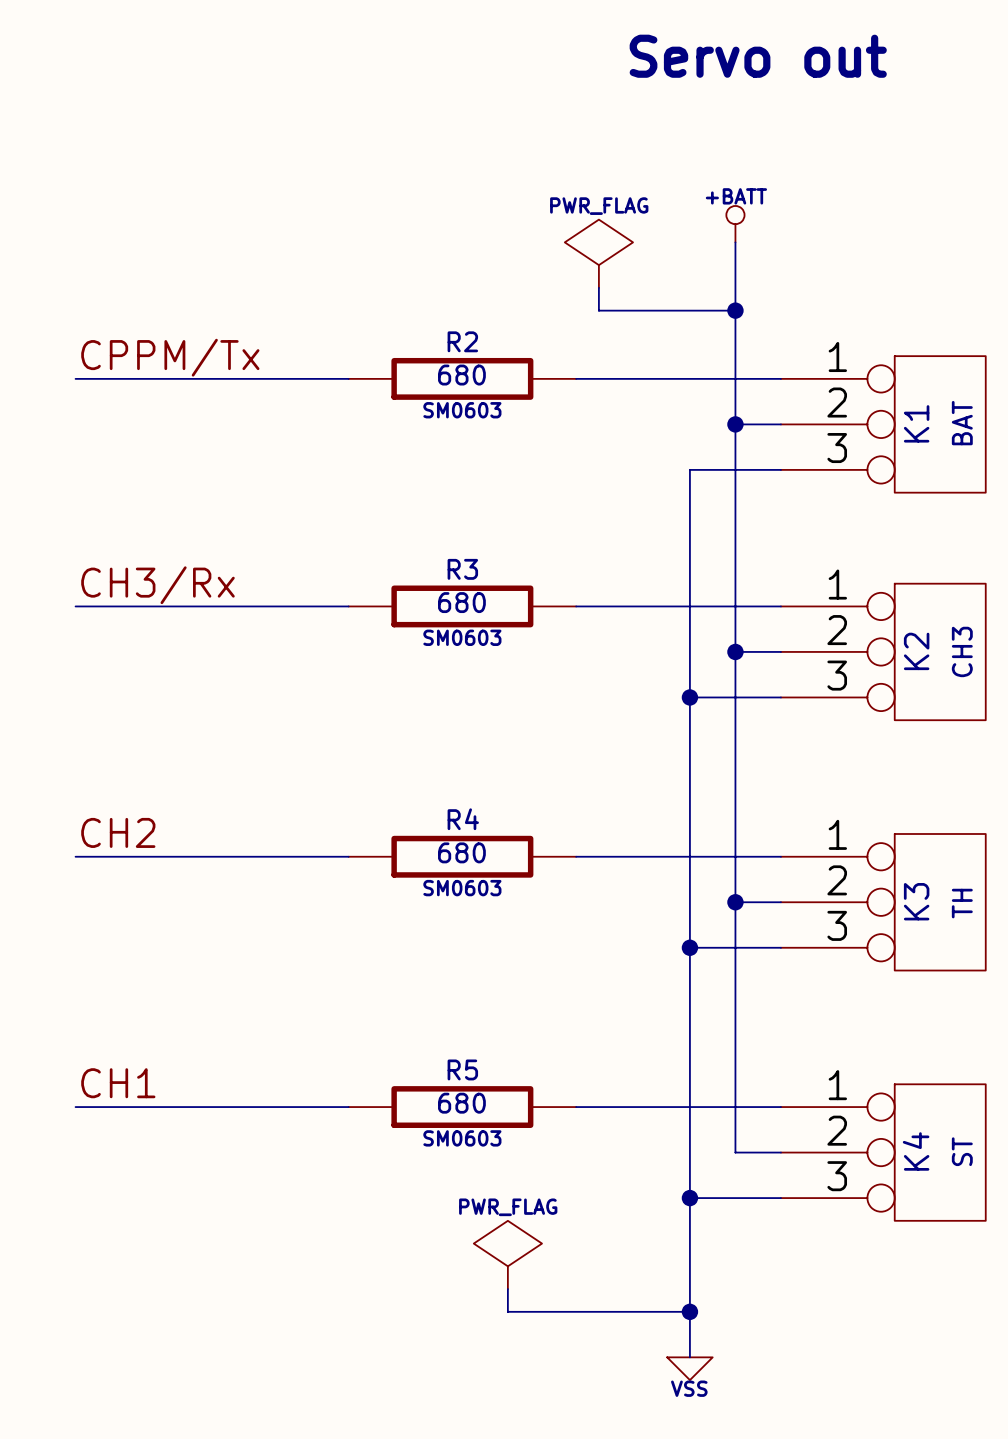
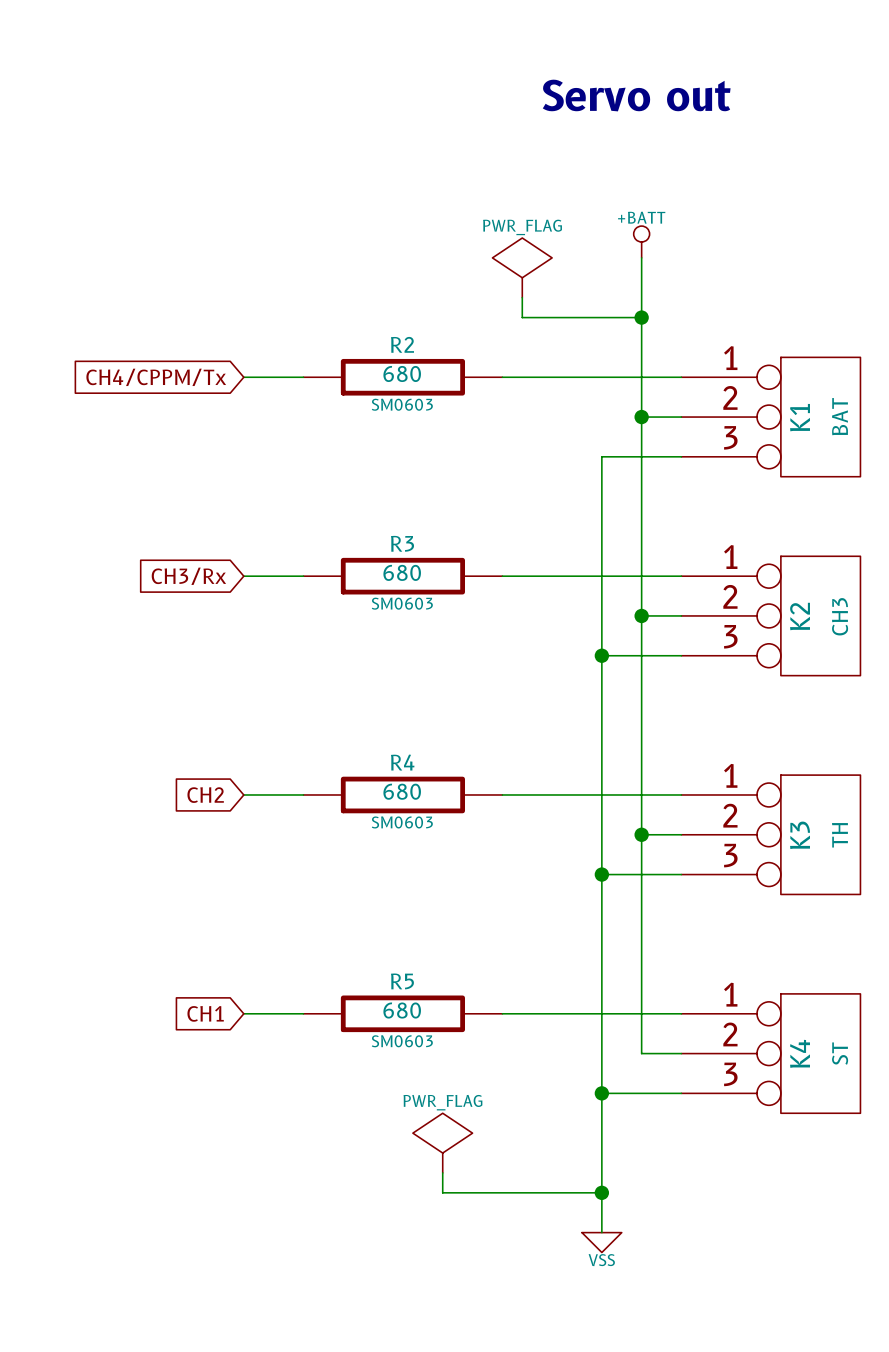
label: CPPM/Tx (170, 357) -> none
wire: (75, 378) (280, 378) -> none
global label: none -> CH4/CPPM/Tx (156, 377)
label: CH3/Rx (157, 585) -> none
wire: (75, 606) (280, 606) -> none
global label: none -> CH3/Rx (188, 576)
label: CH2 (118, 832) -> none
wire: (75, 856) (280, 856) -> none
global label: none -> CH2 (205, 795)
label: CH1 (118, 1083) -> none
wire: (75, 1107) (280, 1107) -> none
global label: none -> CH1 (205, 1013)

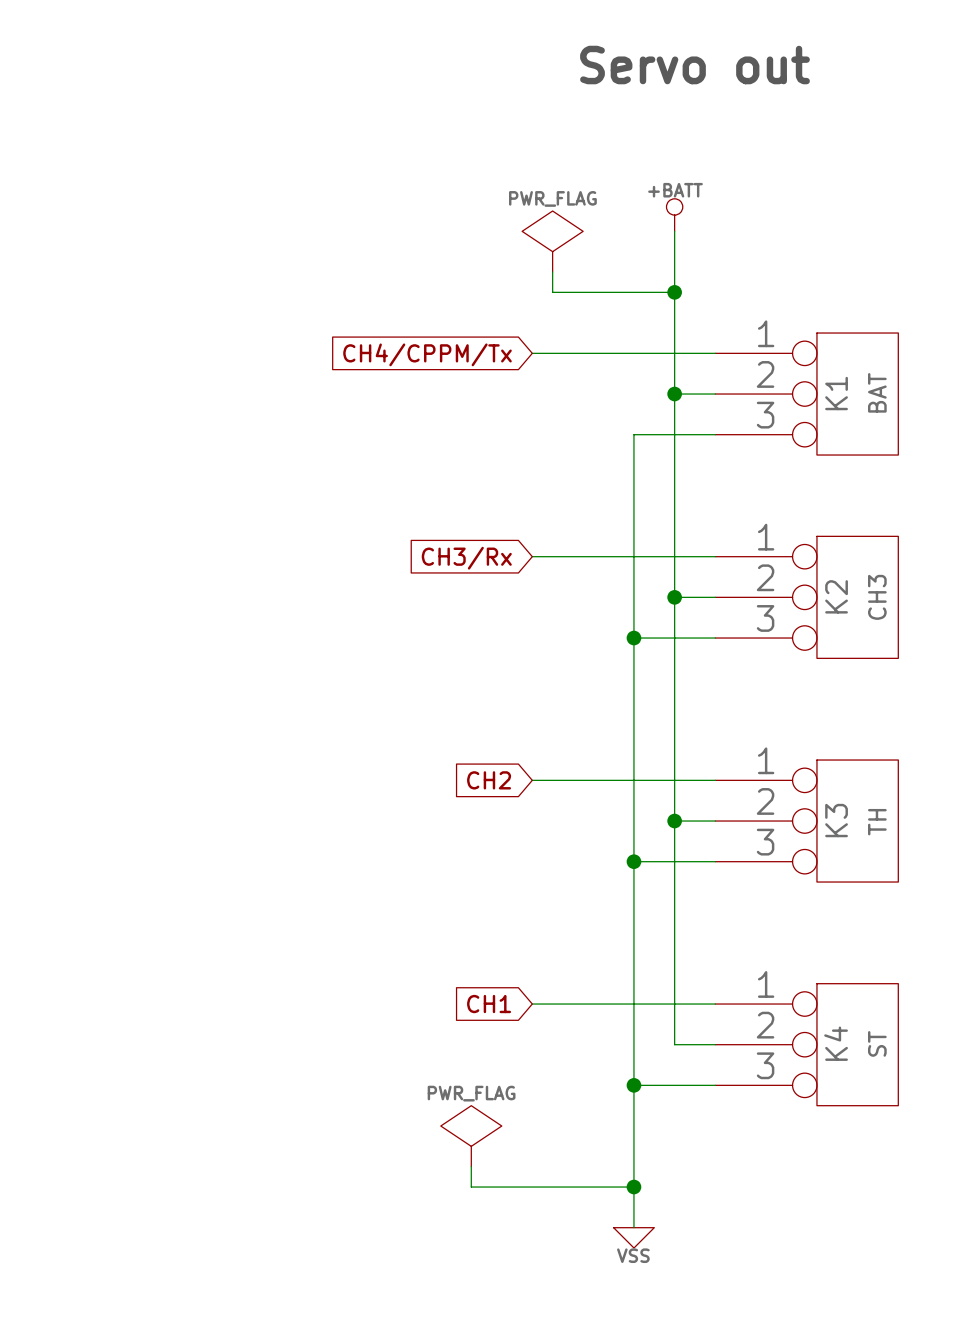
global label position: CH4/CPPM/Tx (156, 377) -> CH4/CPPM/Tx (427, 354)
wire: (243, 377) (303, 377) -> none
R2: 680 (402, 377) -> none
global label position: CH3/Rx (188, 576) -> CH3/Rx (466, 558)
wire: (243, 576) (303, 576) -> none
R3: 680 (402, 576) -> none
wire: (243, 794) (303, 794) -> none
R4: 680 (402, 794) -> none
global label position: CH2 (205, 795) -> CH2 (489, 780)
global label position: CH1 (205, 1013) -> CH1 (489, 1004)
wire: (243, 1013) (303, 1013) -> none
R5: 680 (402, 1013) -> none

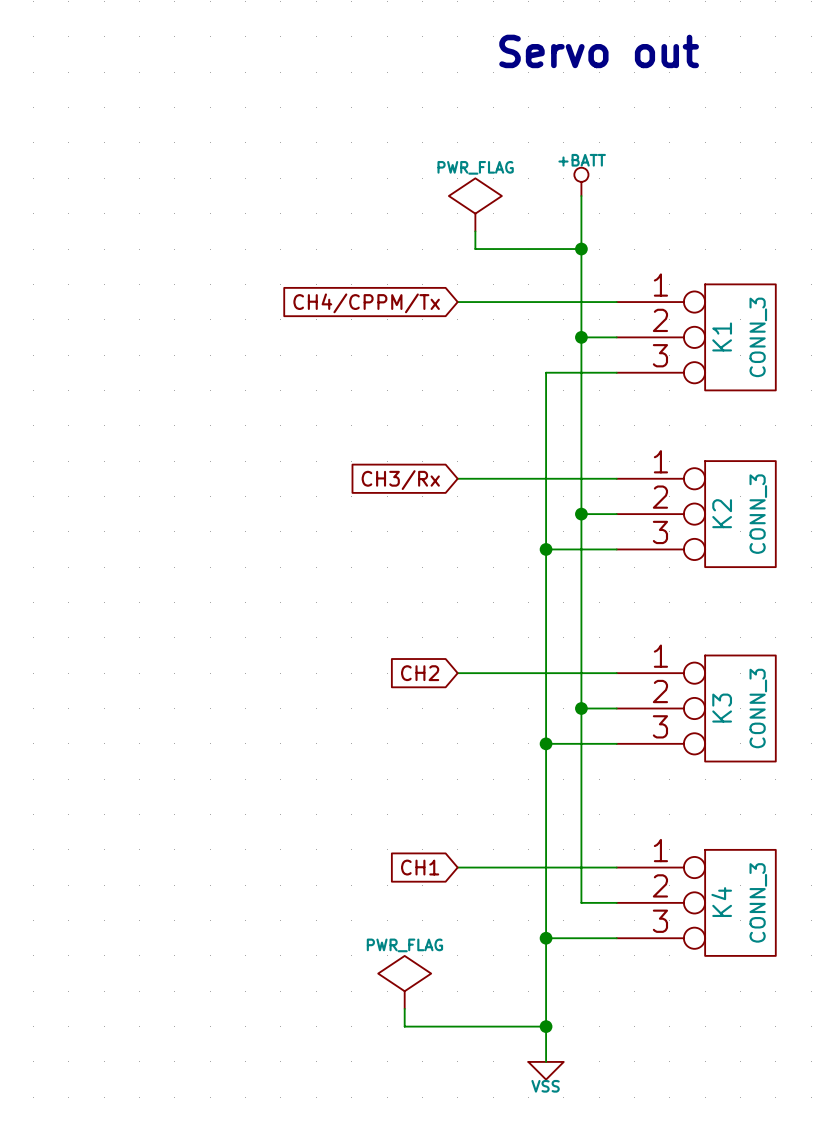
K1 value: BAT (877, 392) -> CONN_3 (758, 337)
K2 value: CH3 (877, 597) -> CONN_3 (758, 514)
K3 value: TH (877, 822) -> CONN_3 (758, 708)
K4 value: ST (877, 1043) -> CONN_3 (758, 902)

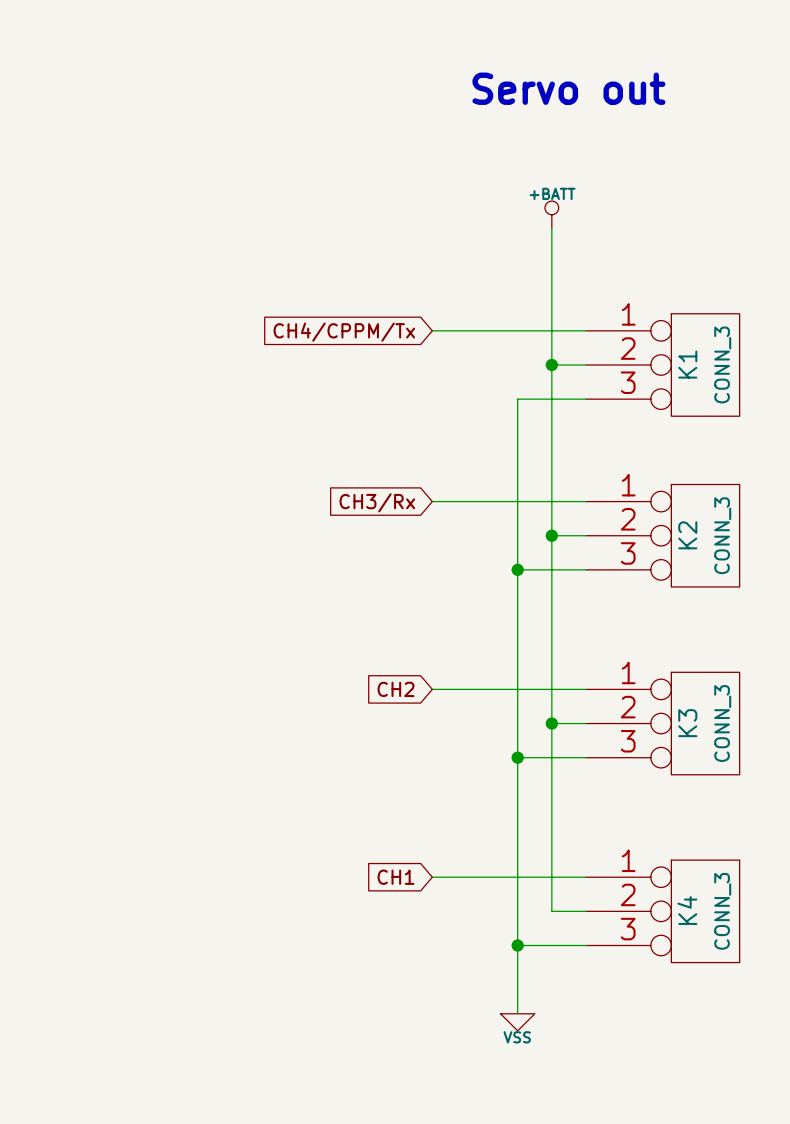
power symbol: PWR_FLAG (475, 204) -> none
wire: (475, 231) (475, 249) (581, 249) -> none
junction: (581, 249) -> none
power symbol: PWR_FLAG (404, 982) -> none
wire: (404, 1008) (404, 1026) (546, 1026) -> none
wire: (546, 1008) (546, 1061) -> none
junction: (546, 1026) -> none
power symbol position: VSS (546, 1070) -> VSS (517, 1022)

